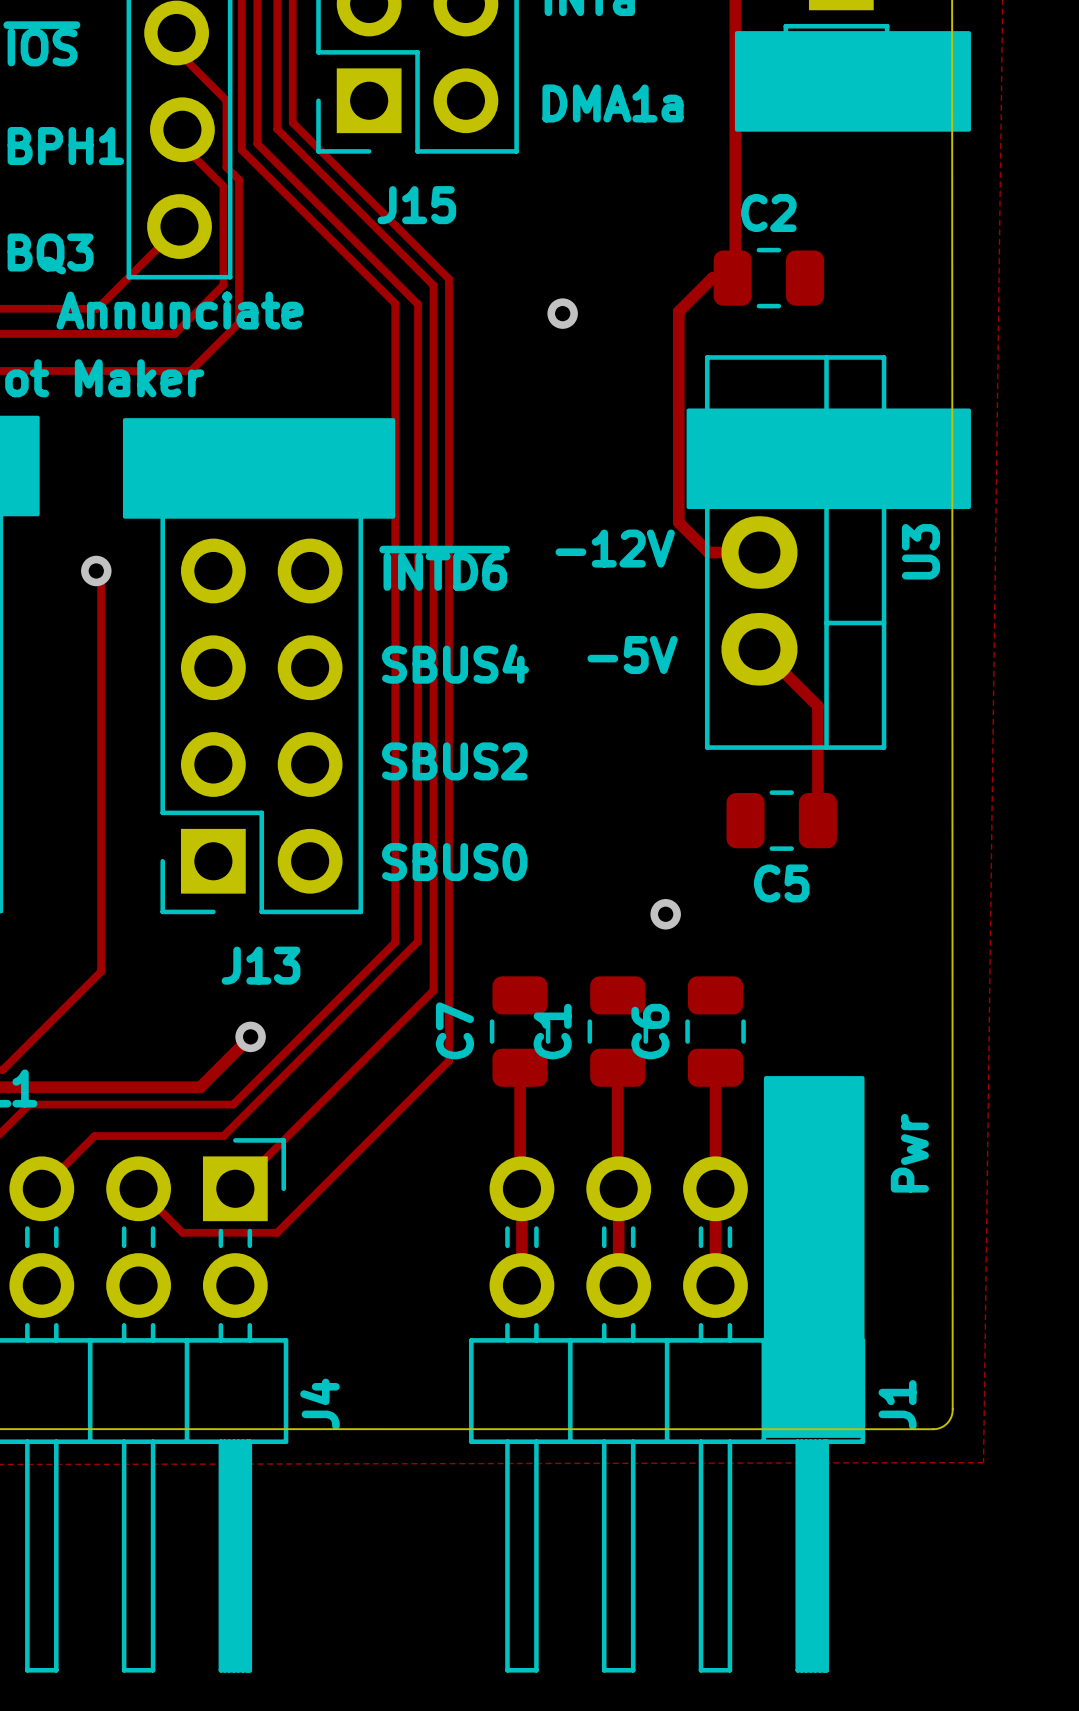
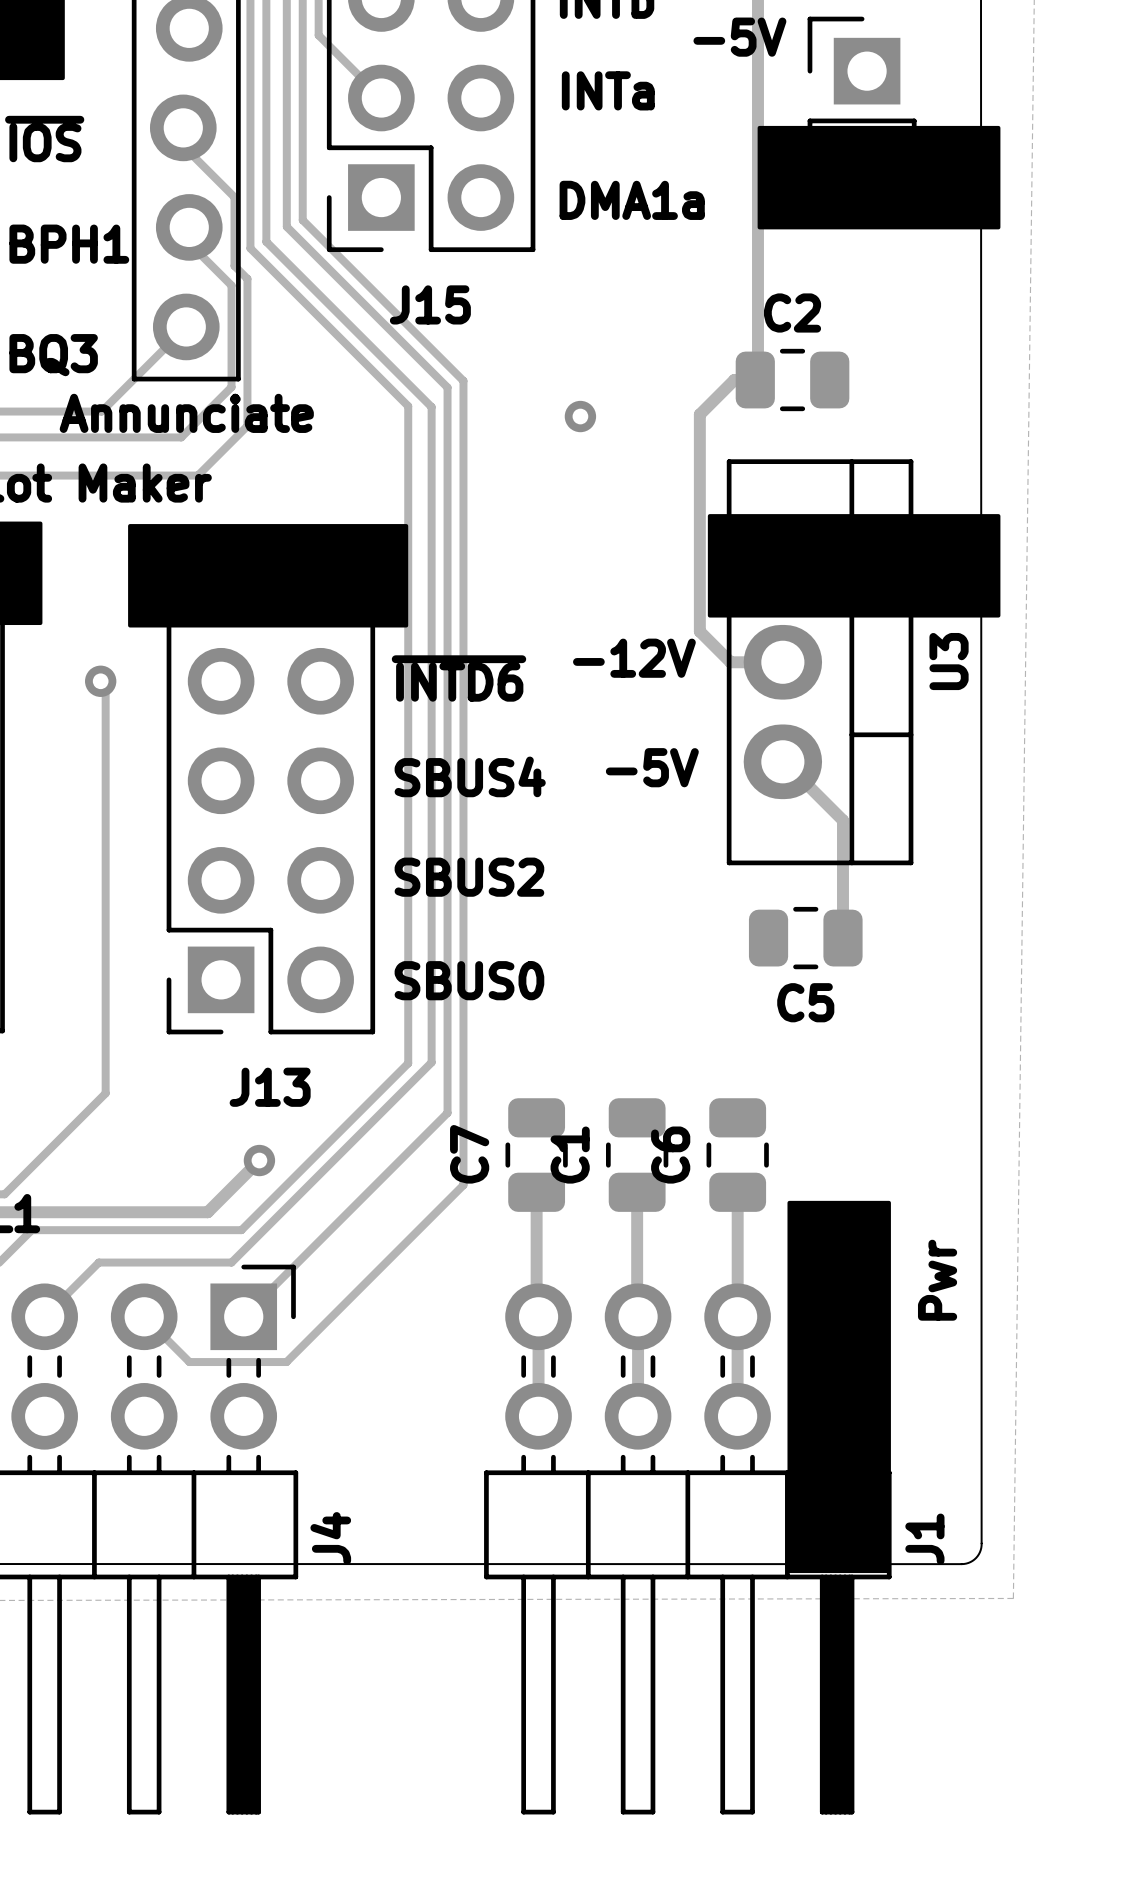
via: (665, 914) -> none

